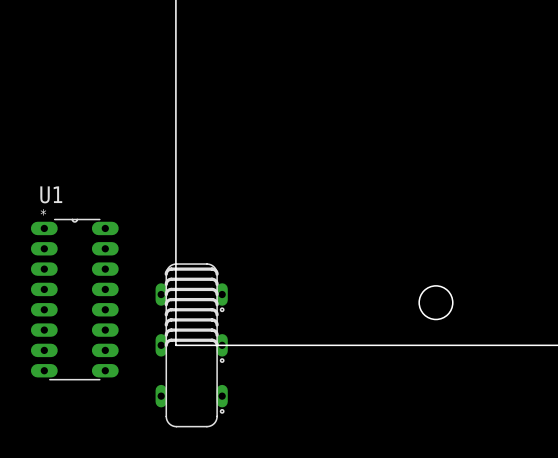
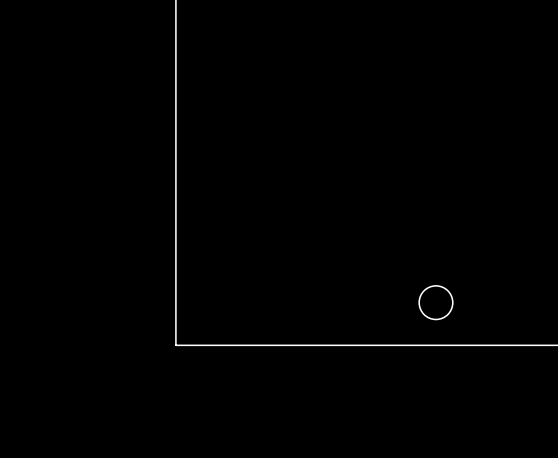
U1: (74, 299) -> none
part: (191, 345) -> none

